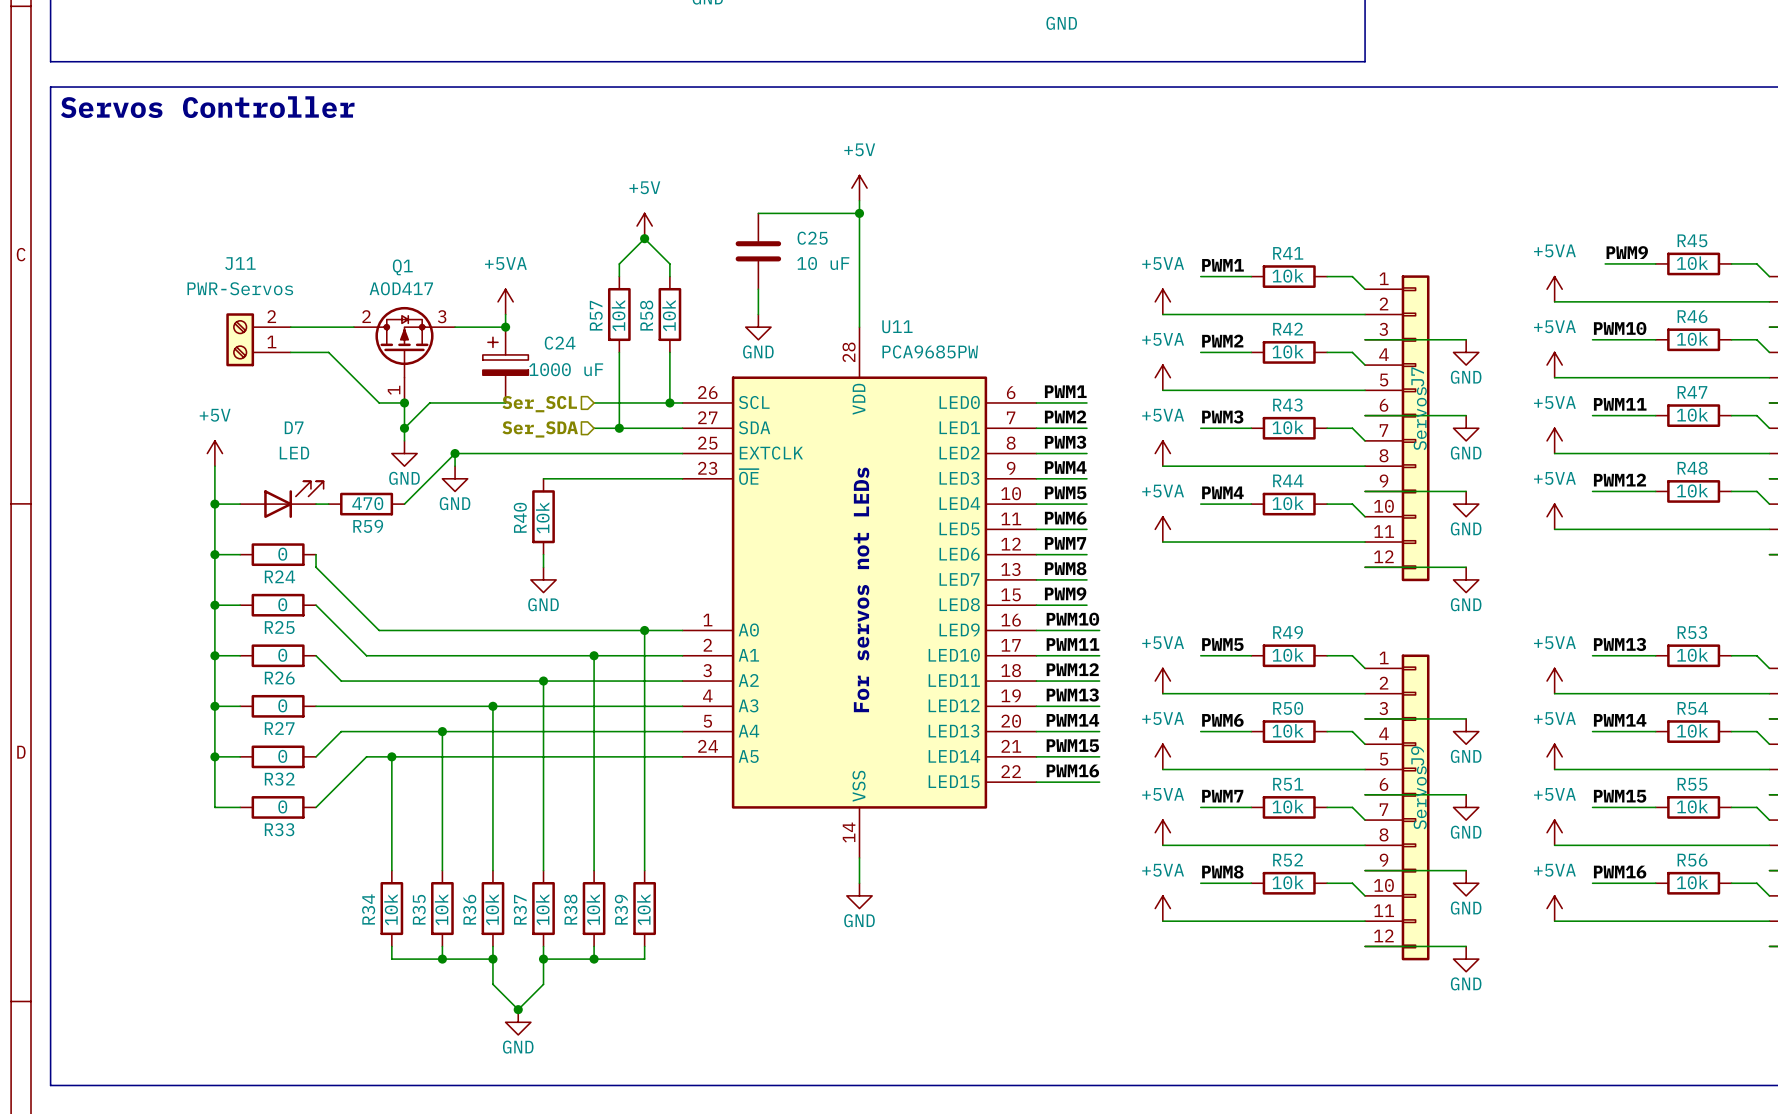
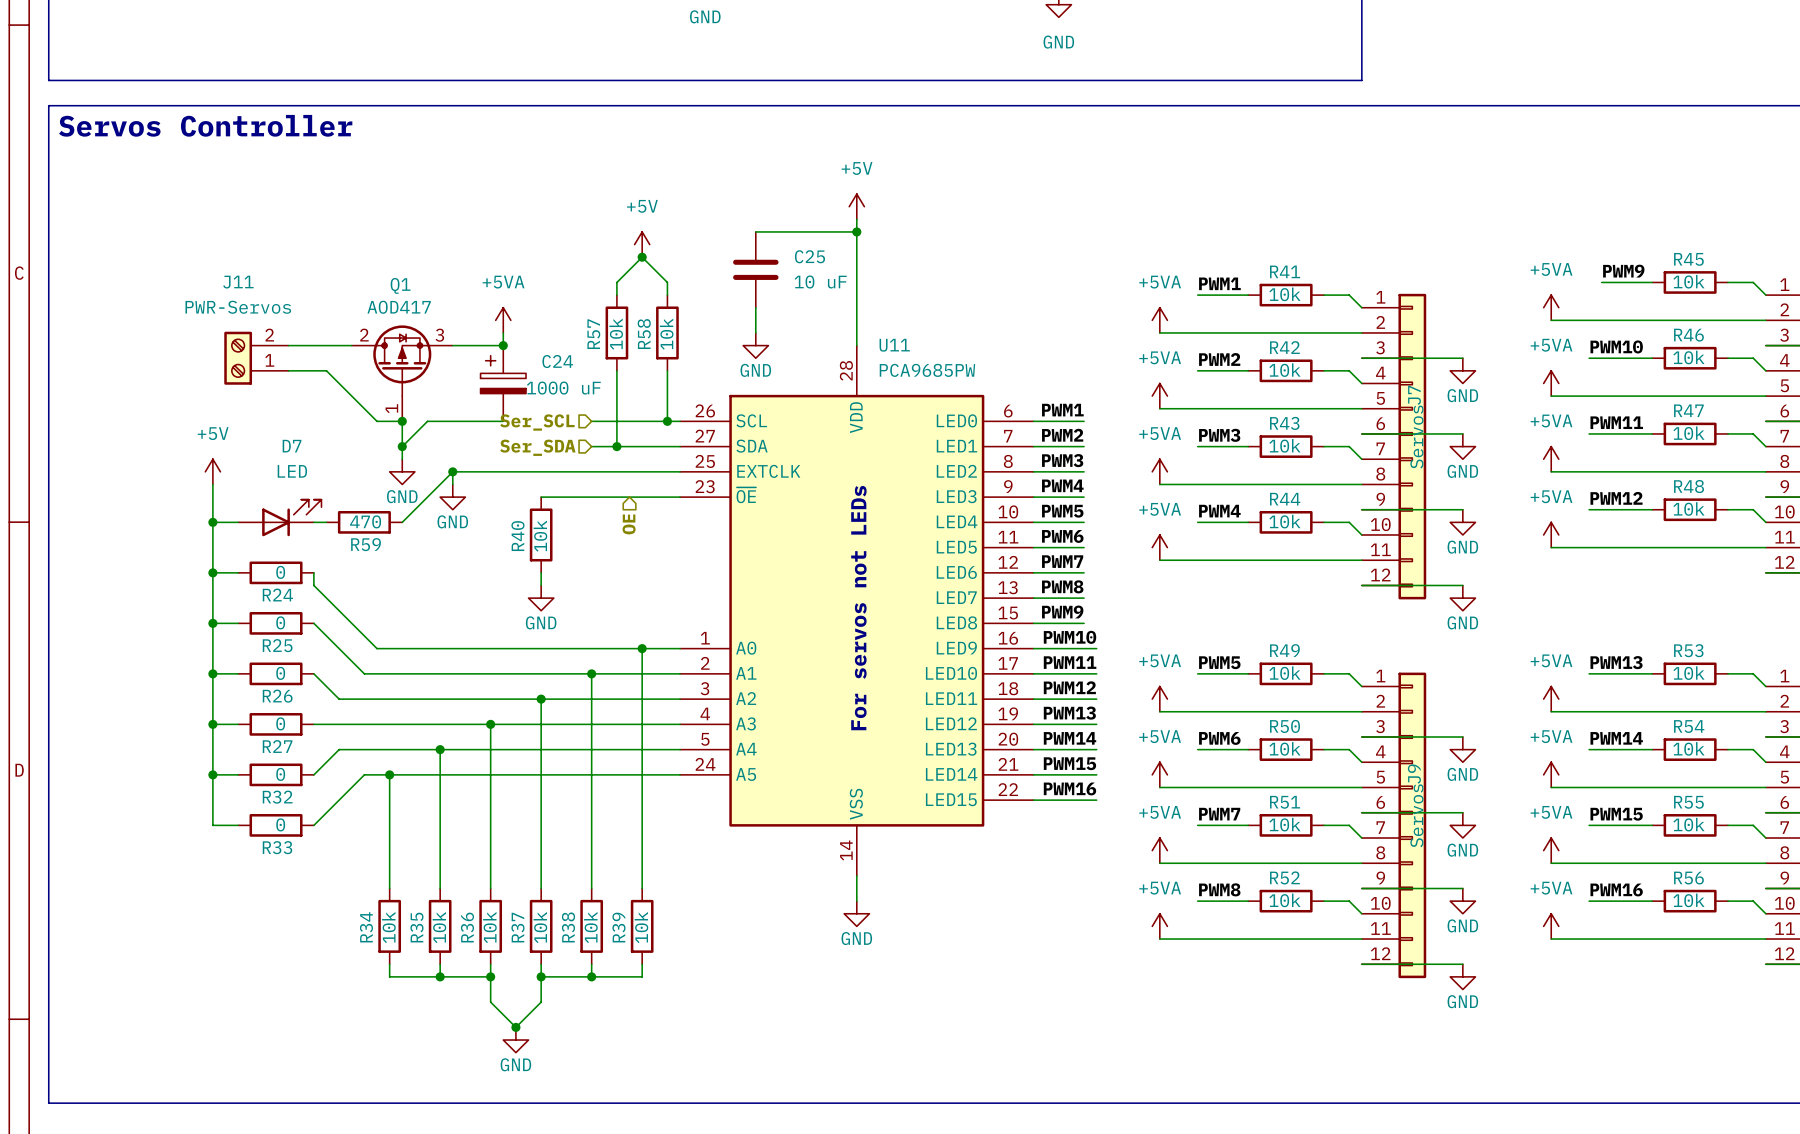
hierarchical label: none -> OE (629, 524)

